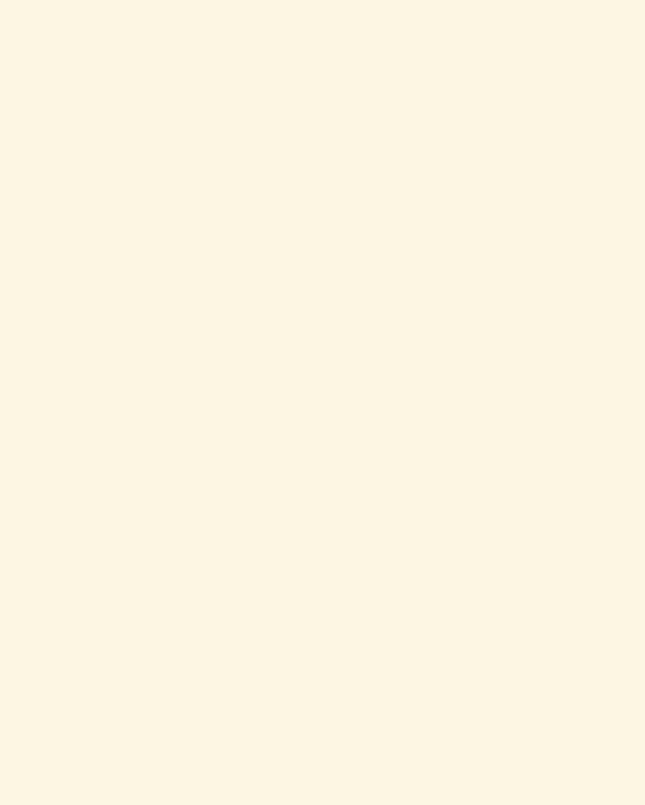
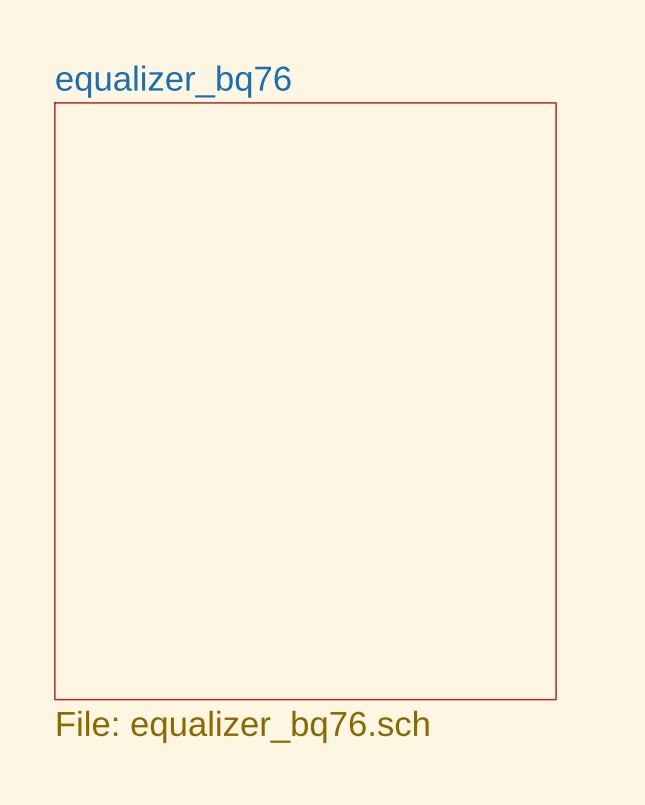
sheet equalizer_bq76: none -> File: equalizer_bq76.sch (305, 401)

